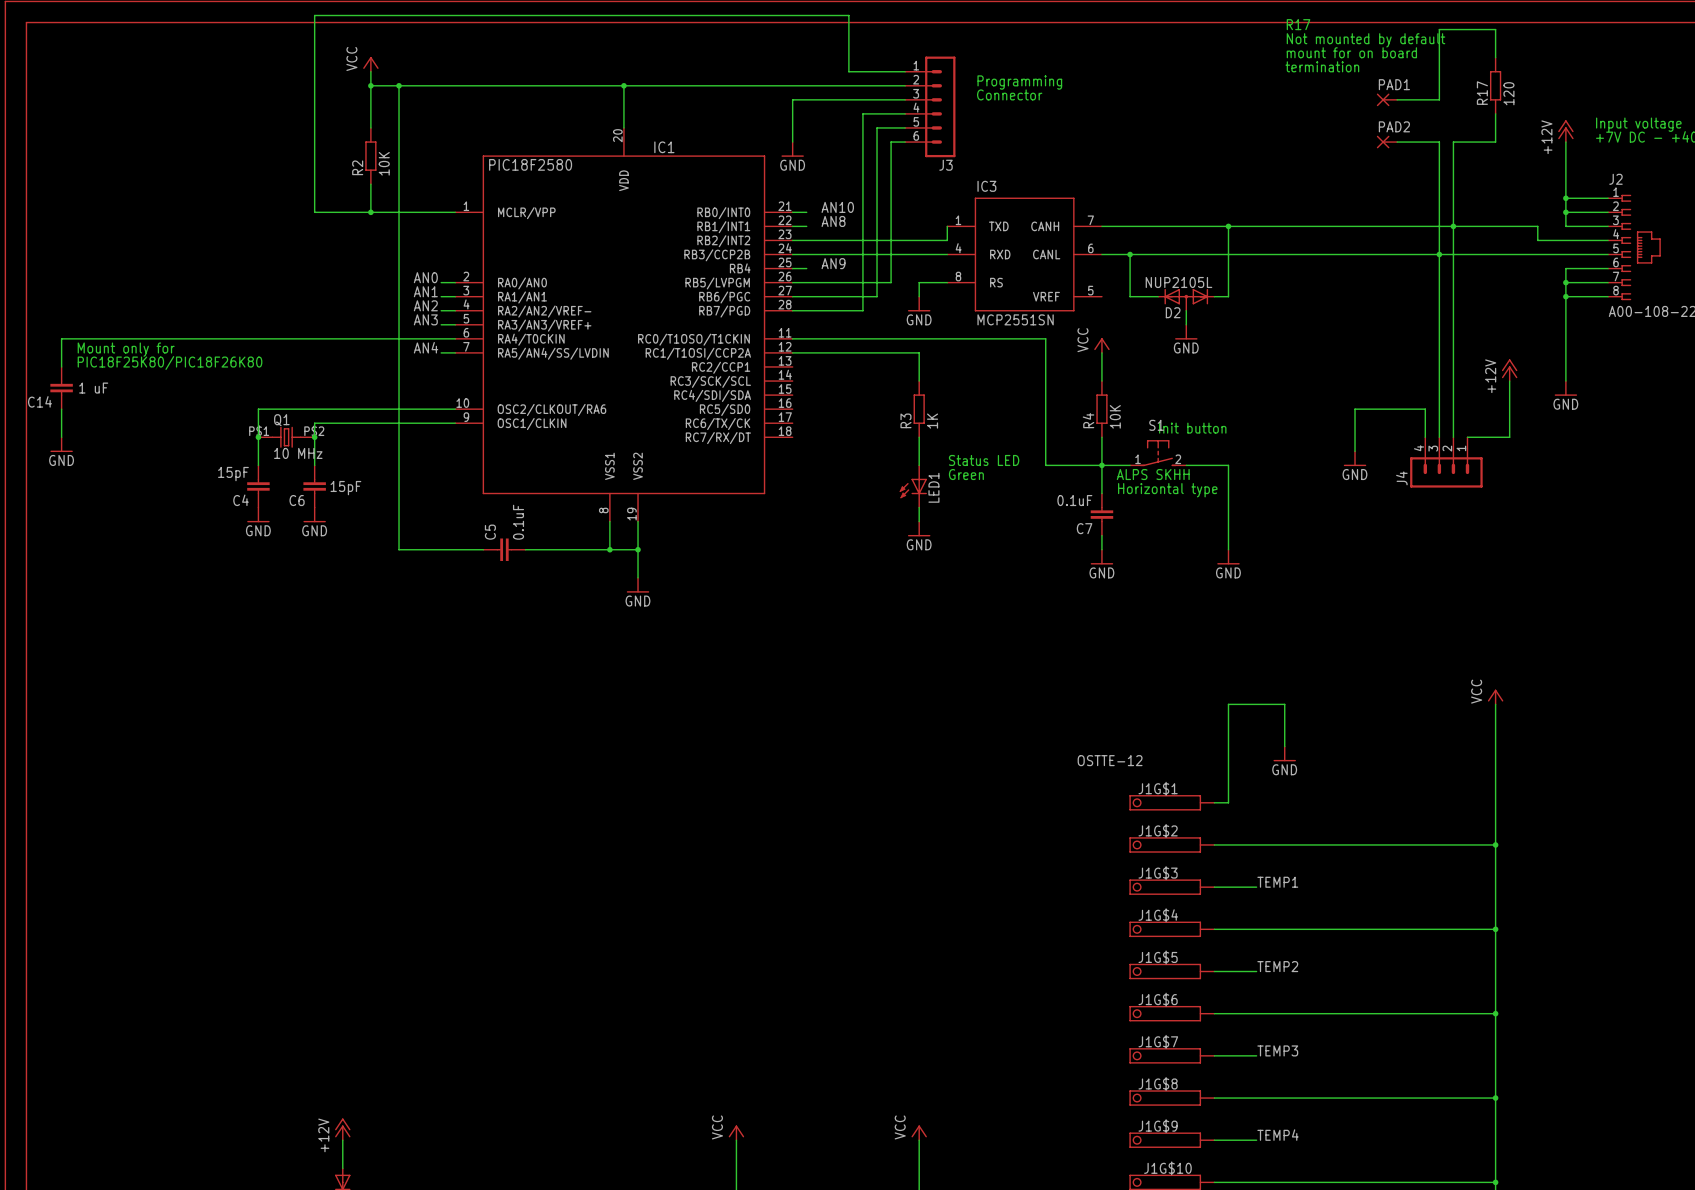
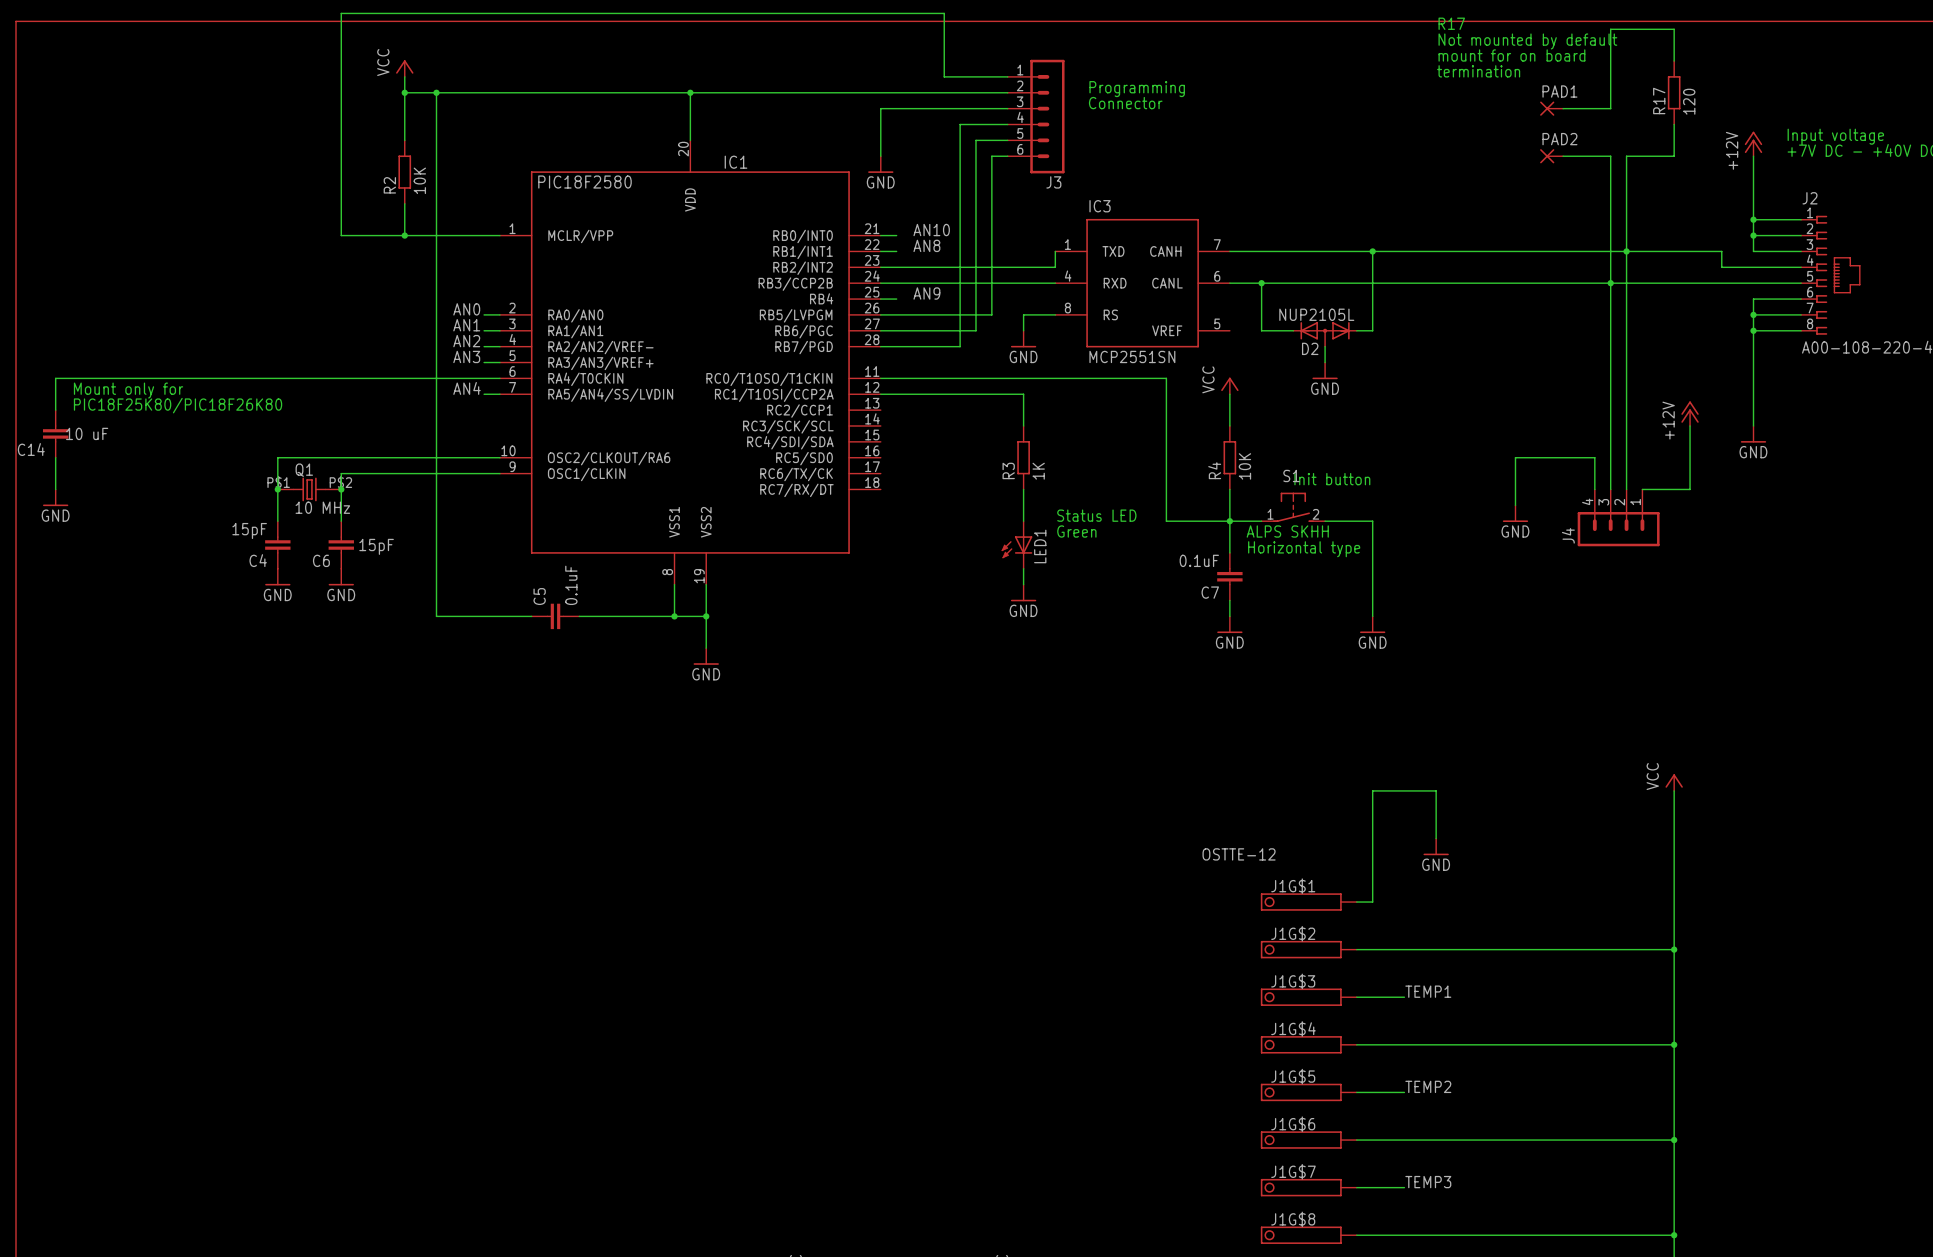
C14 value: 1 uF (93, 388) -> 10 uF (87, 433)

